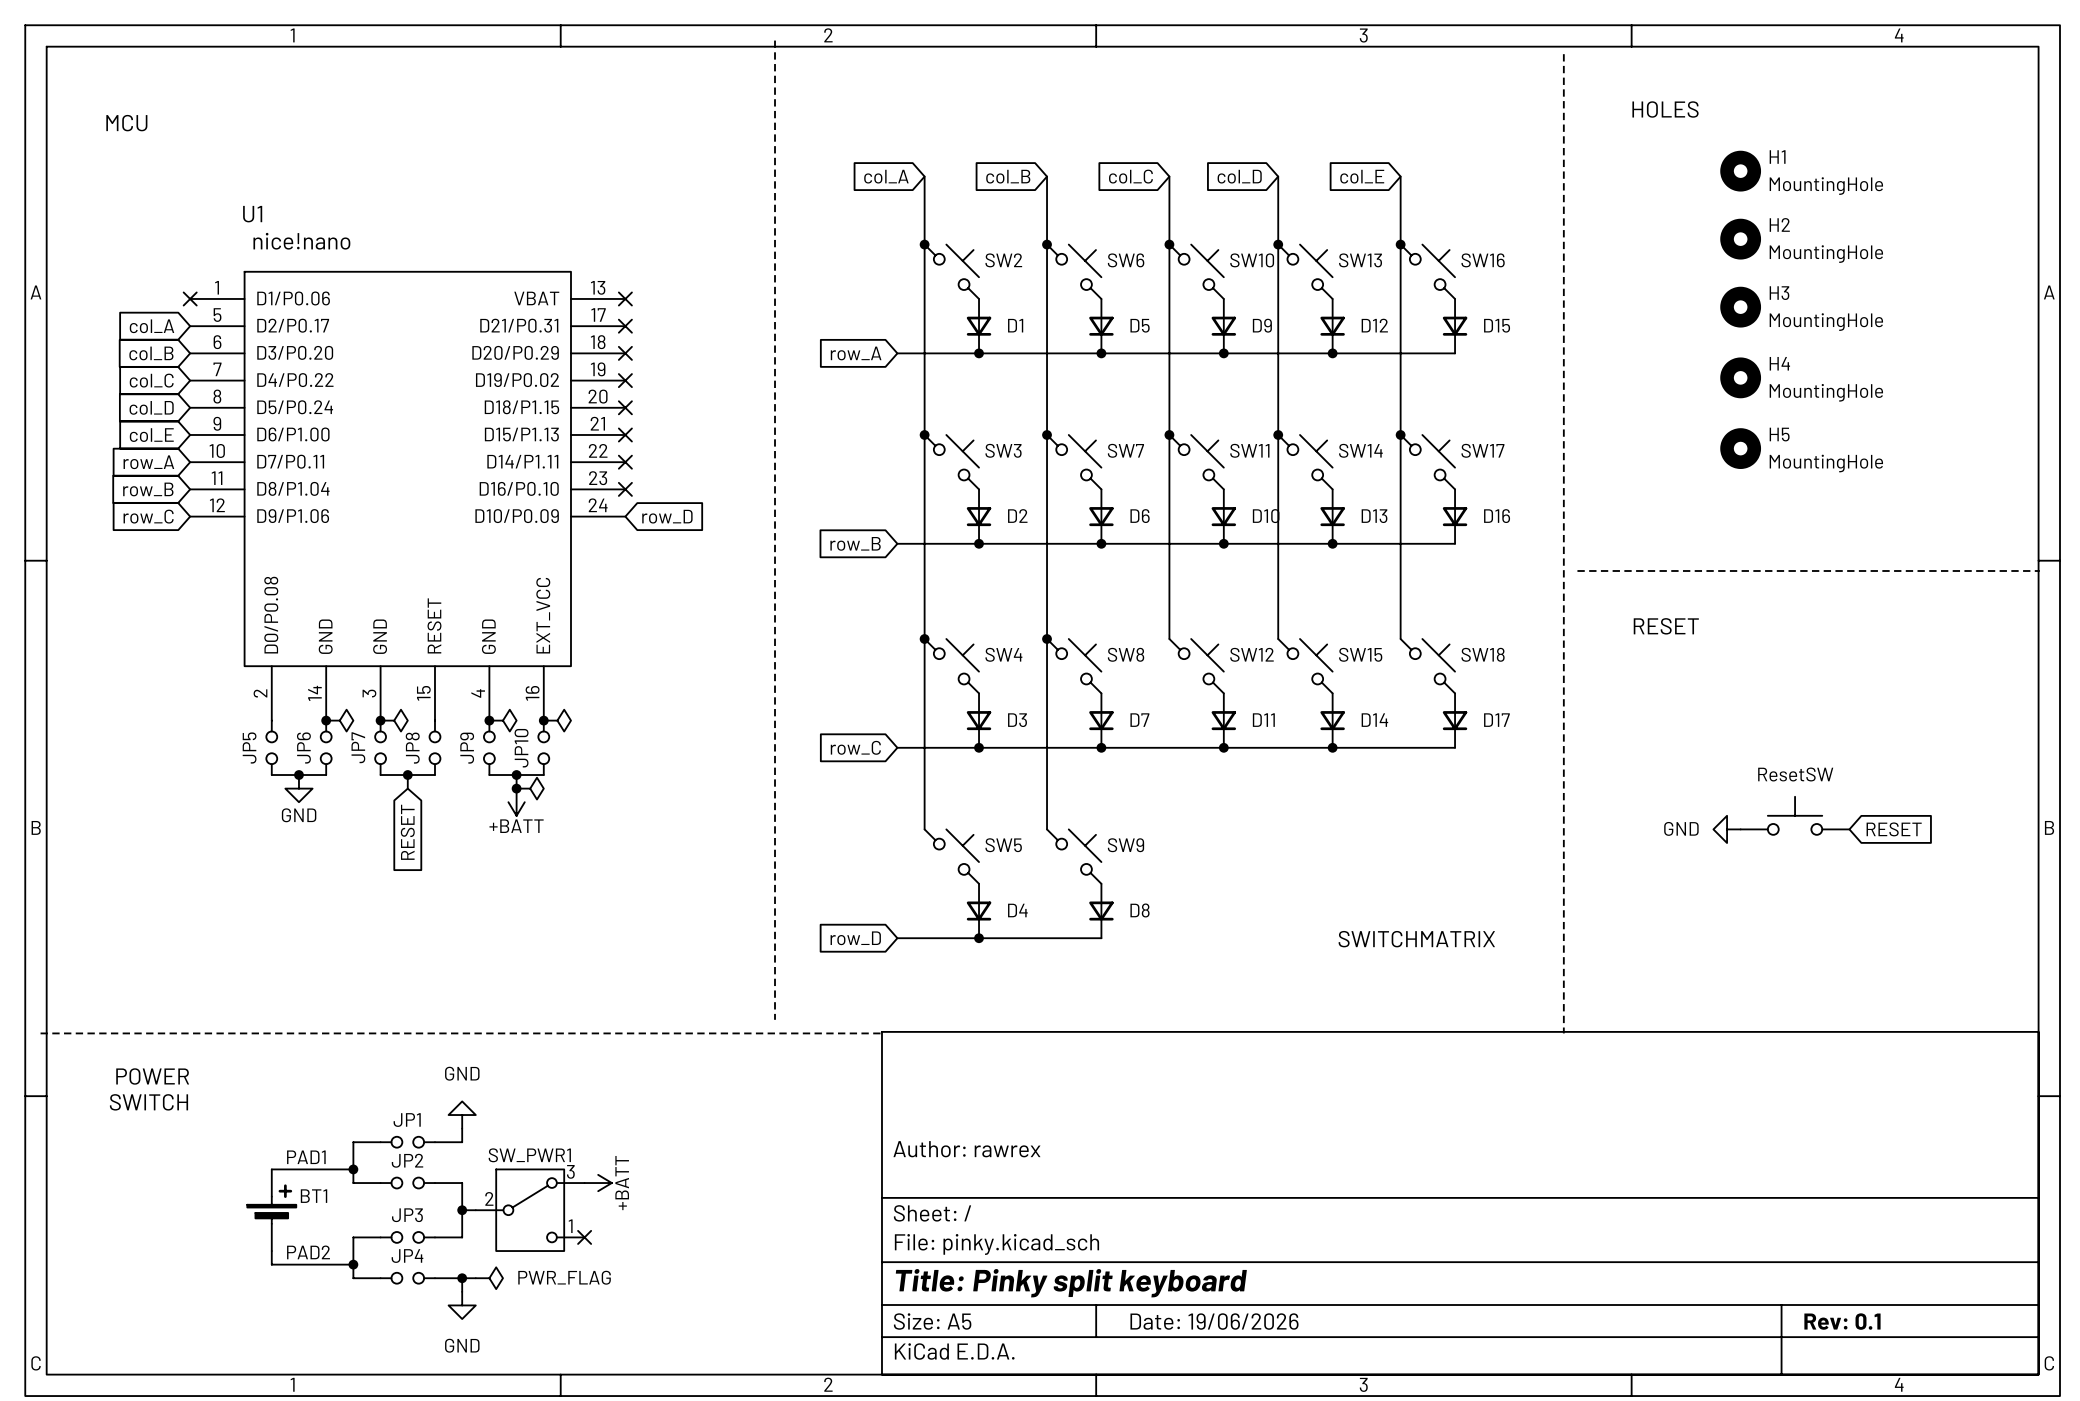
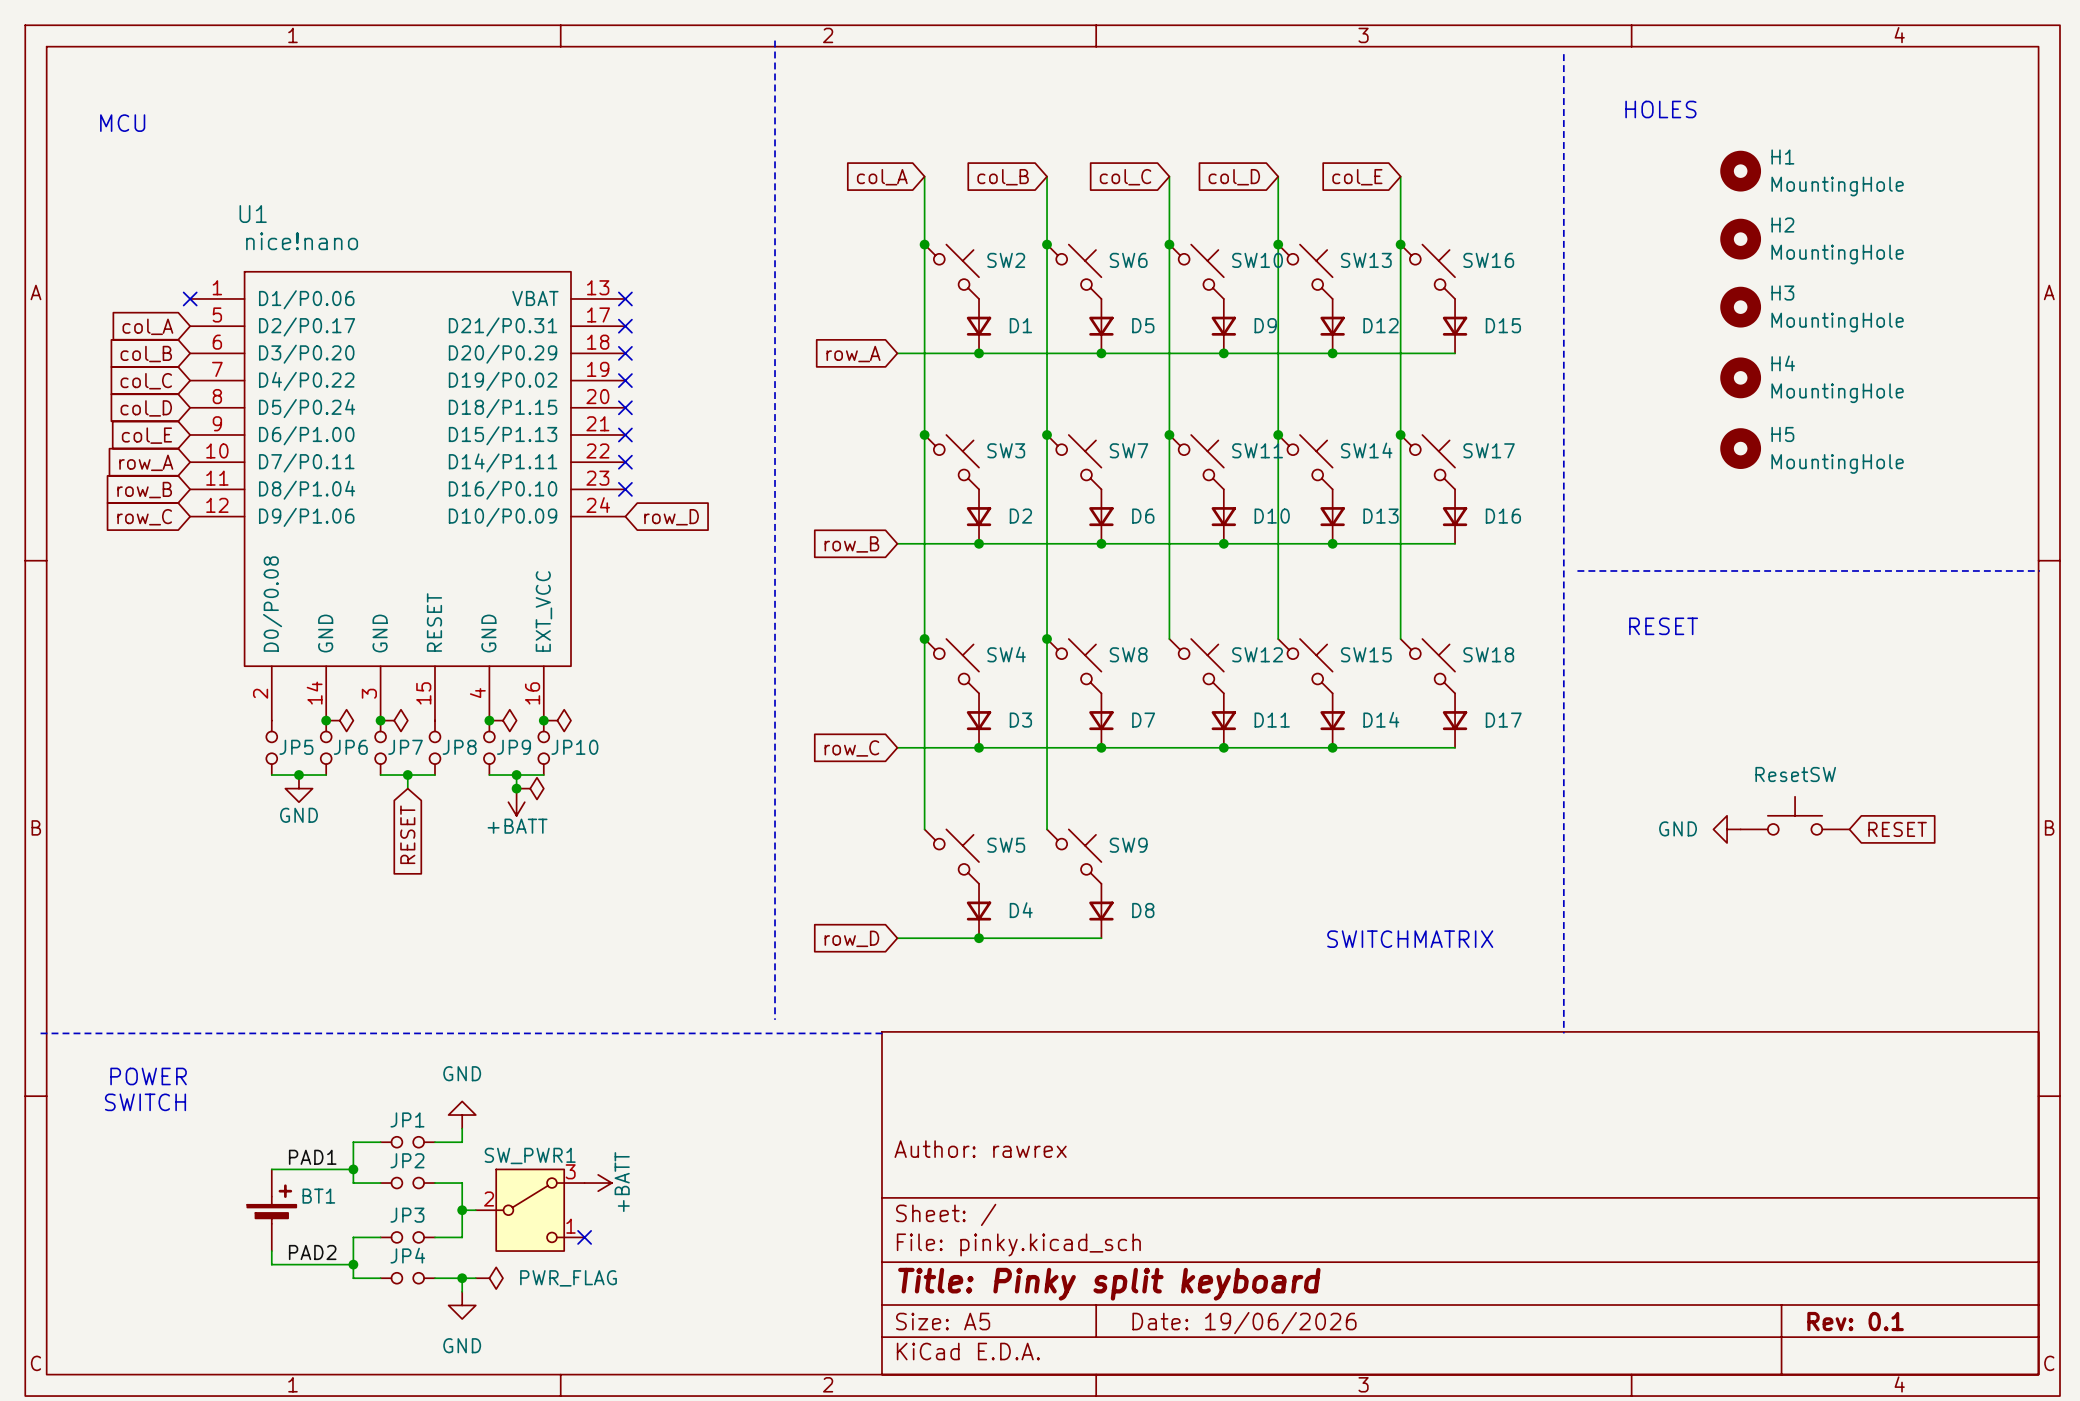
JP7 name rotation: 0° (358, 747) -> 90° clockwise (405, 747)
JP7 name position: JP7 (358, 747) -> JP7 (405, 747)
JP5 name rotation: 0° (249, 748) -> 90° clockwise (296, 747)
JP5 name position: JP5 (249, 748) -> JP5 (296, 747)
JP6 name rotation: 0° (303, 748) -> 90° clockwise (350, 747)
JP6 name position: JP6 (303, 748) -> JP6 (350, 747)
JP8 name rotation: 0° (412, 748) -> 90° clockwise (459, 747)
JP8 name position: JP8 (412, 748) -> JP8 (459, 747)
JP9 name rotation: 0° (467, 748) -> 90° clockwise (514, 747)
JP9 name position: JP9 (467, 748) -> JP9 (514, 747)
JP10 name rotation: 0° (521, 748) -> 90° clockwise (574, 747)

